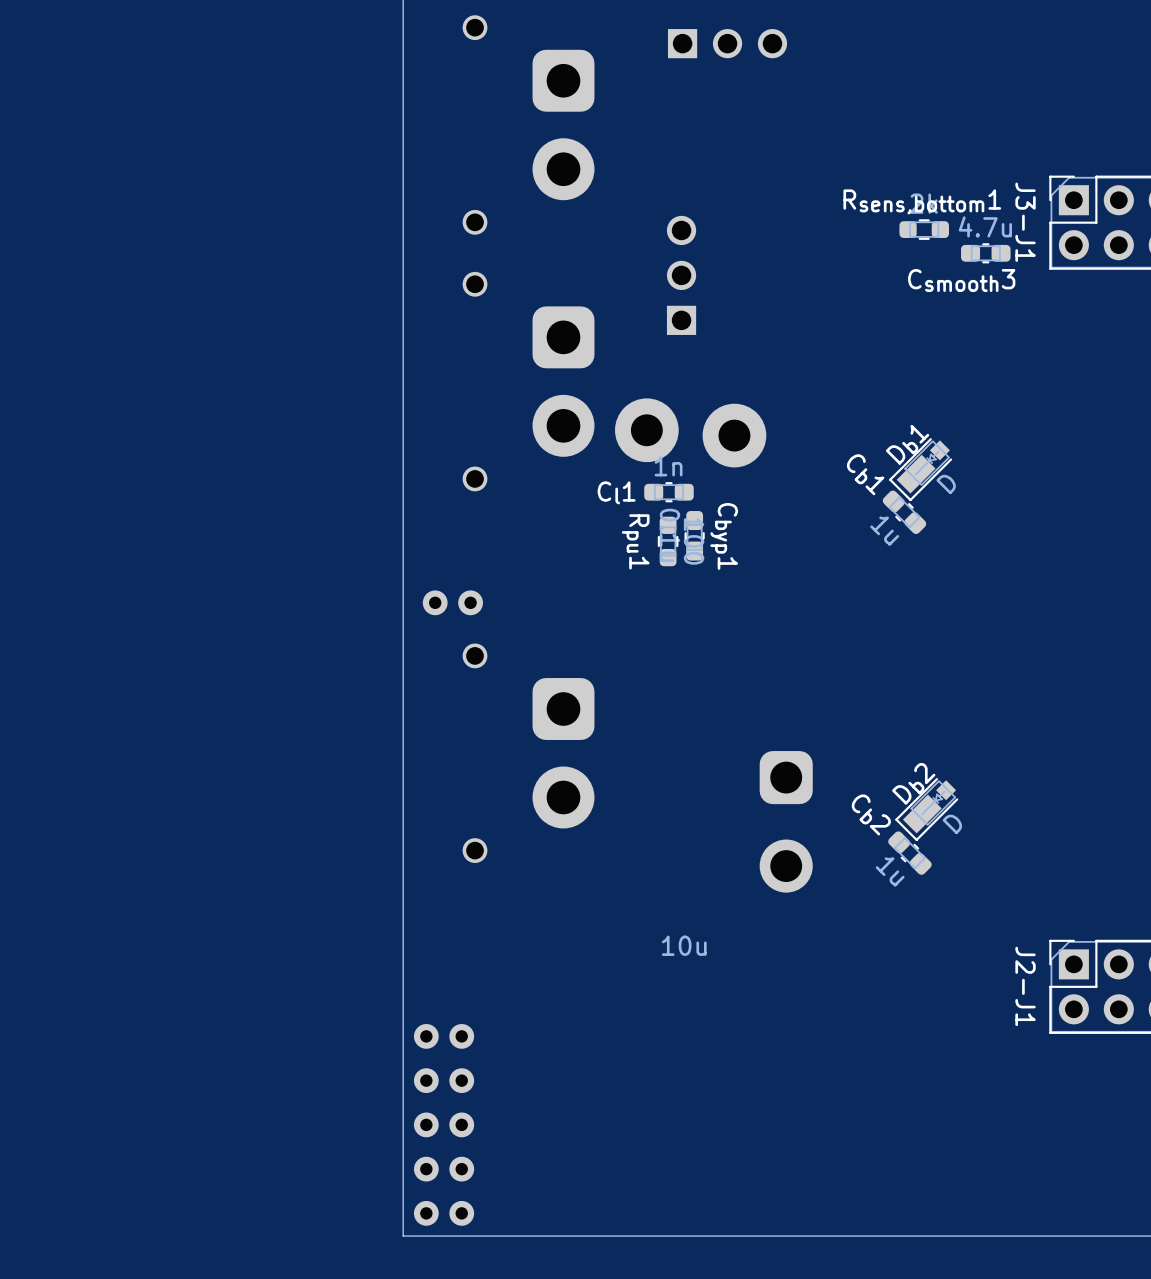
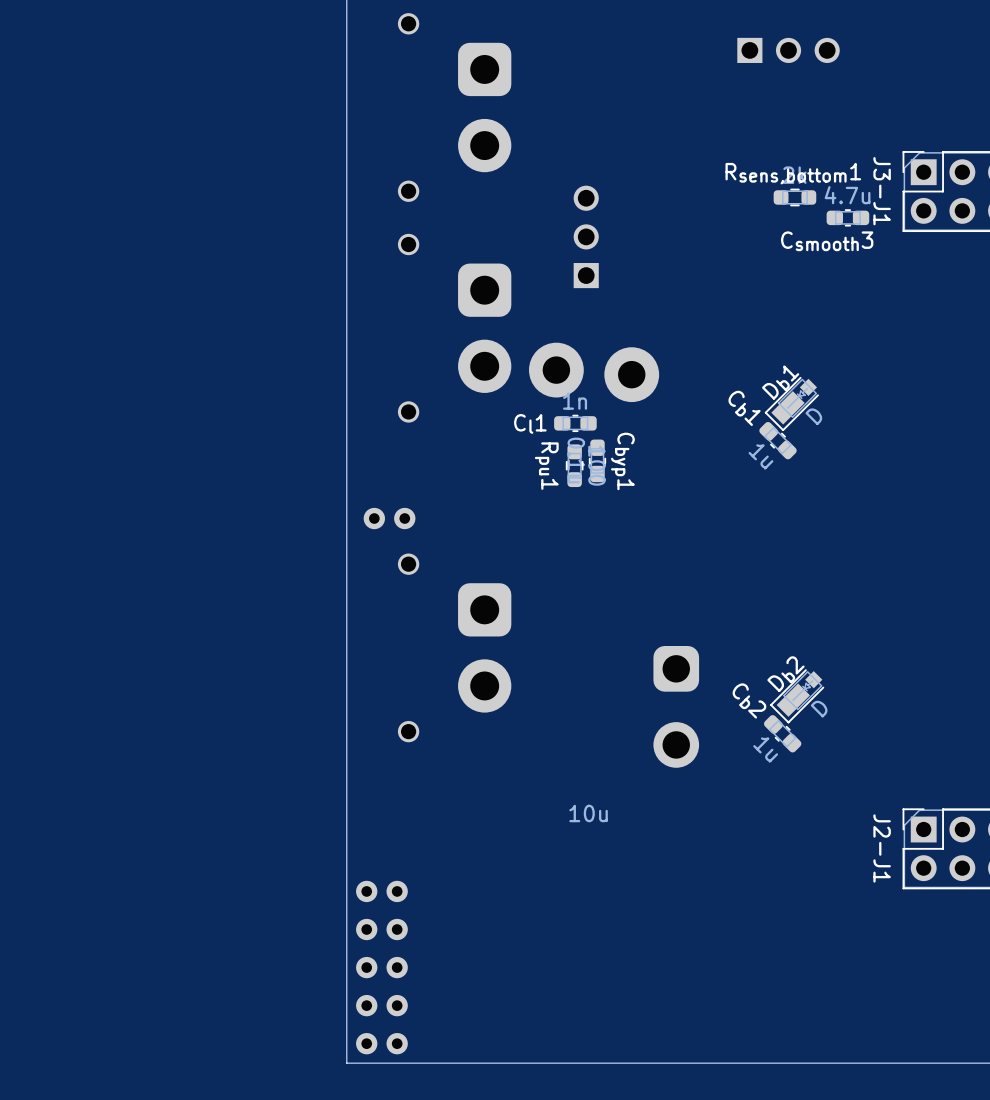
part position: (727, 43) -> (788, 50)

